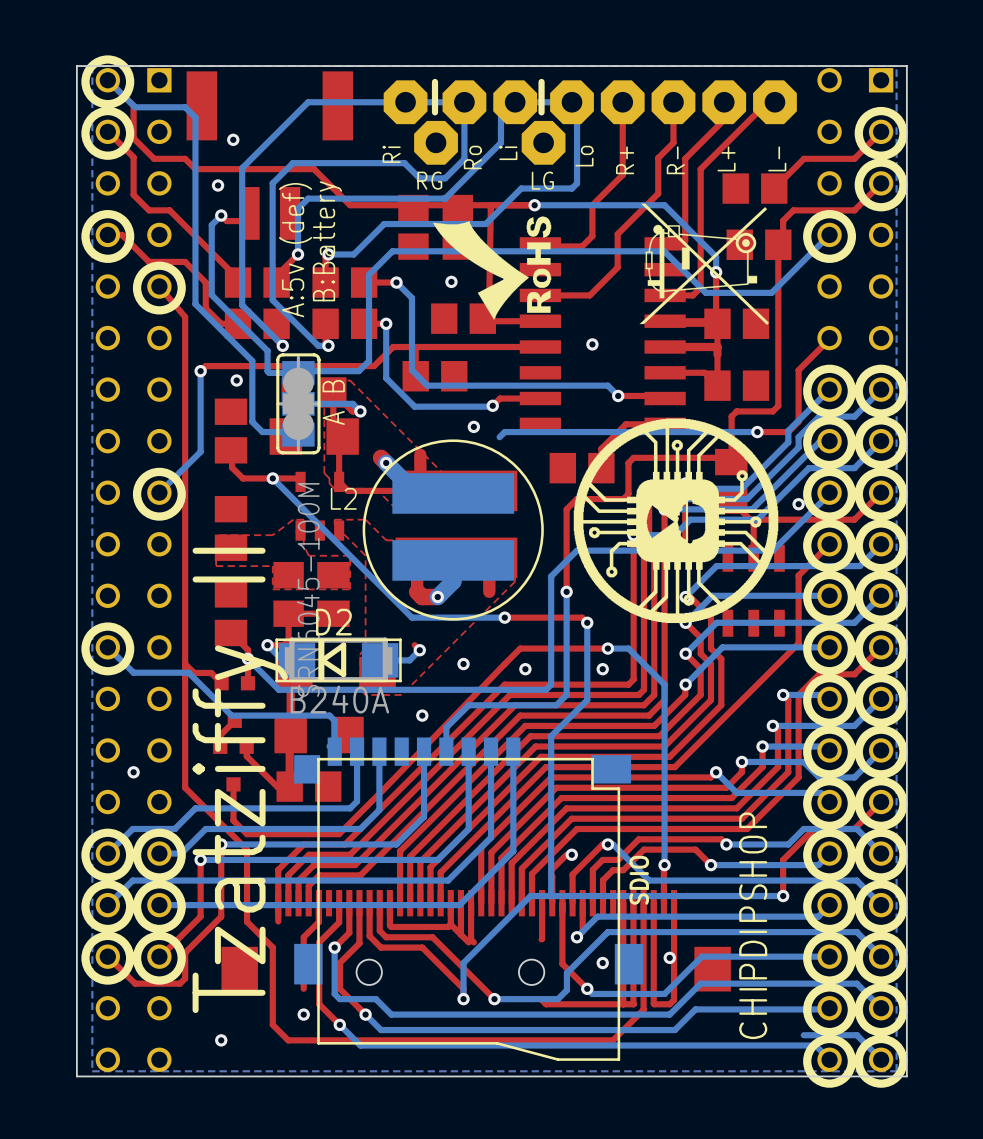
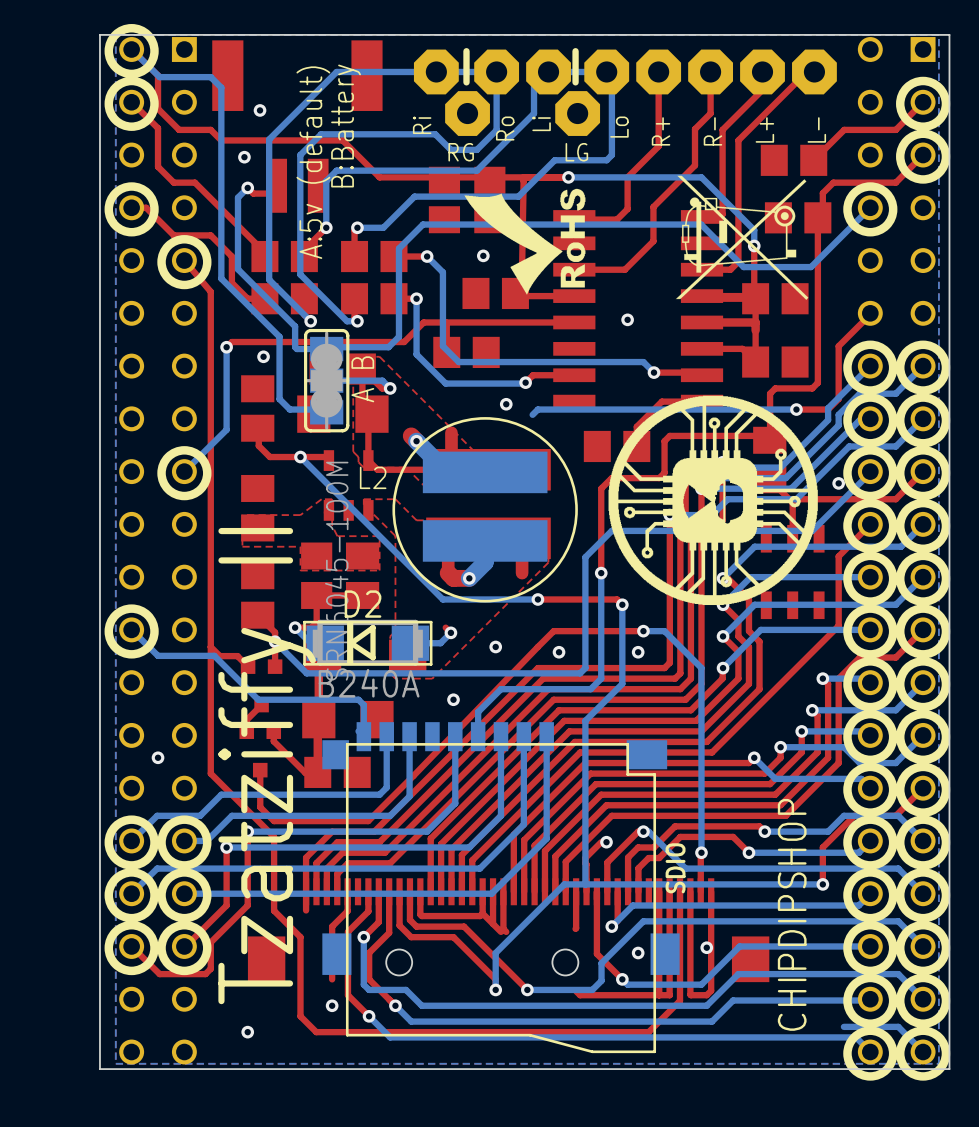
text position: B:Battery (327, 241) -> B:Battery (346, 126)
text: A:5v (def) (295, 250) -> A:5v (default) (313, 162)

